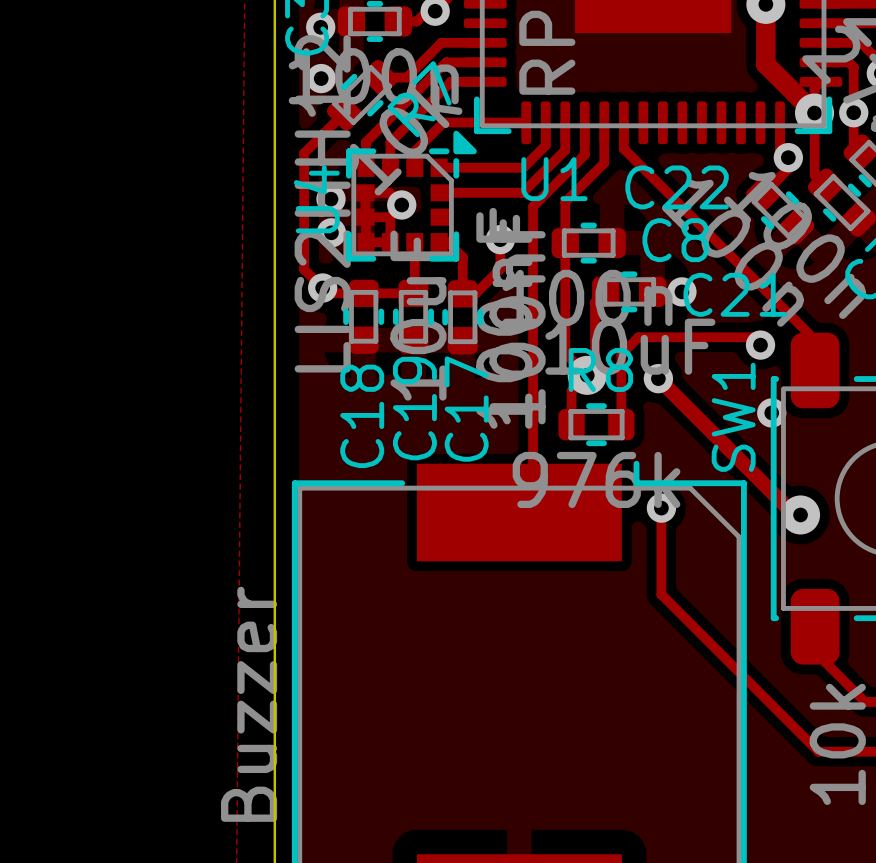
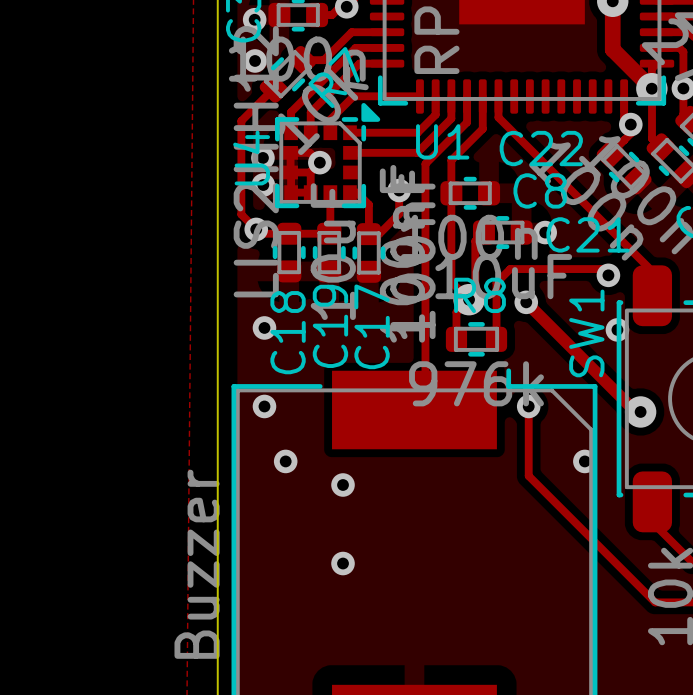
via: none -> (264, 327)
via: none -> (264, 406)
via: none -> (285, 461)
via: none -> (584, 461)
via: none -> (343, 485)
via: none -> (343, 563)

